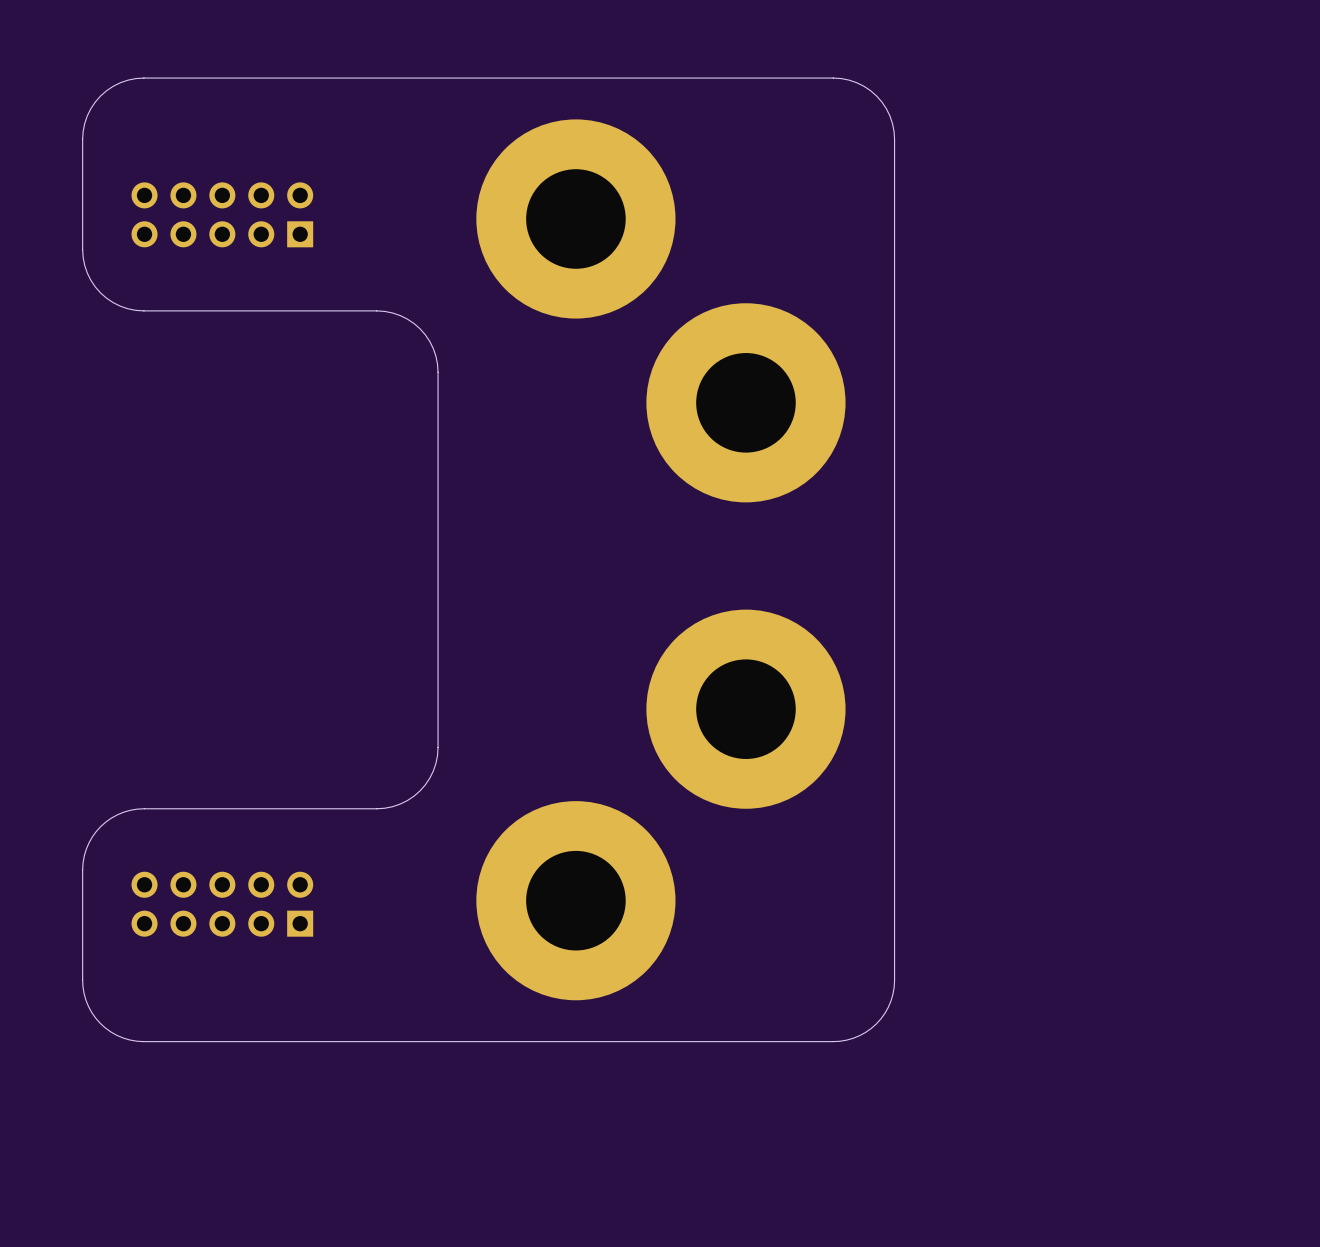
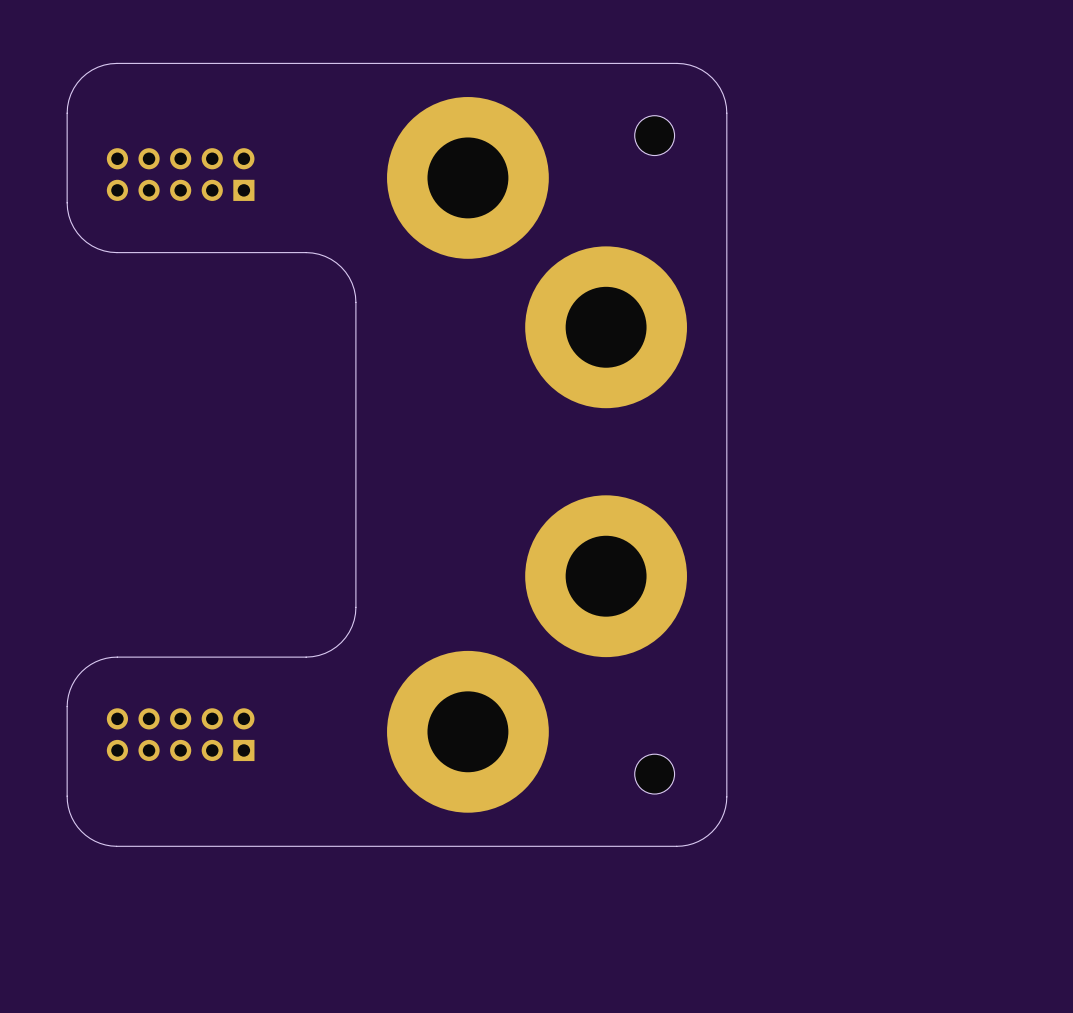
part: none -> (654, 135)
part: none -> (654, 774)

